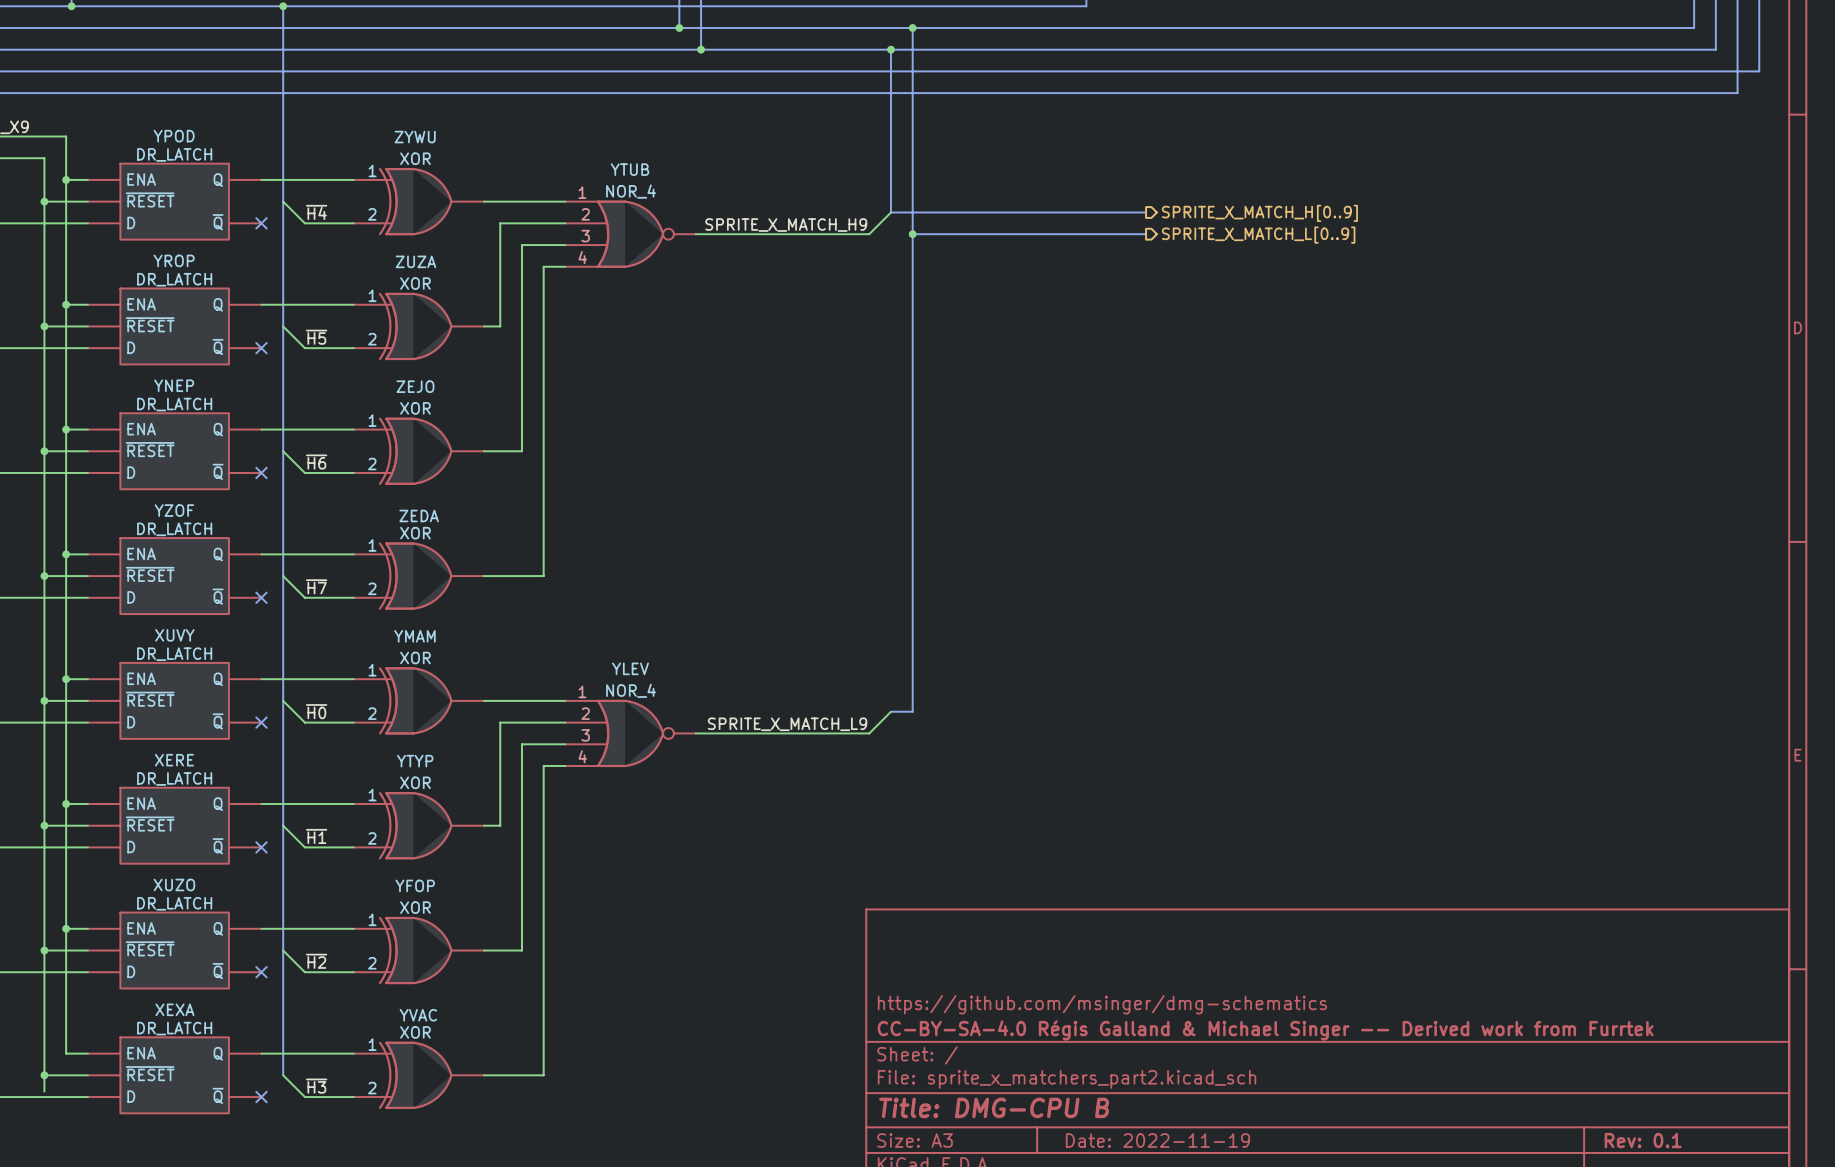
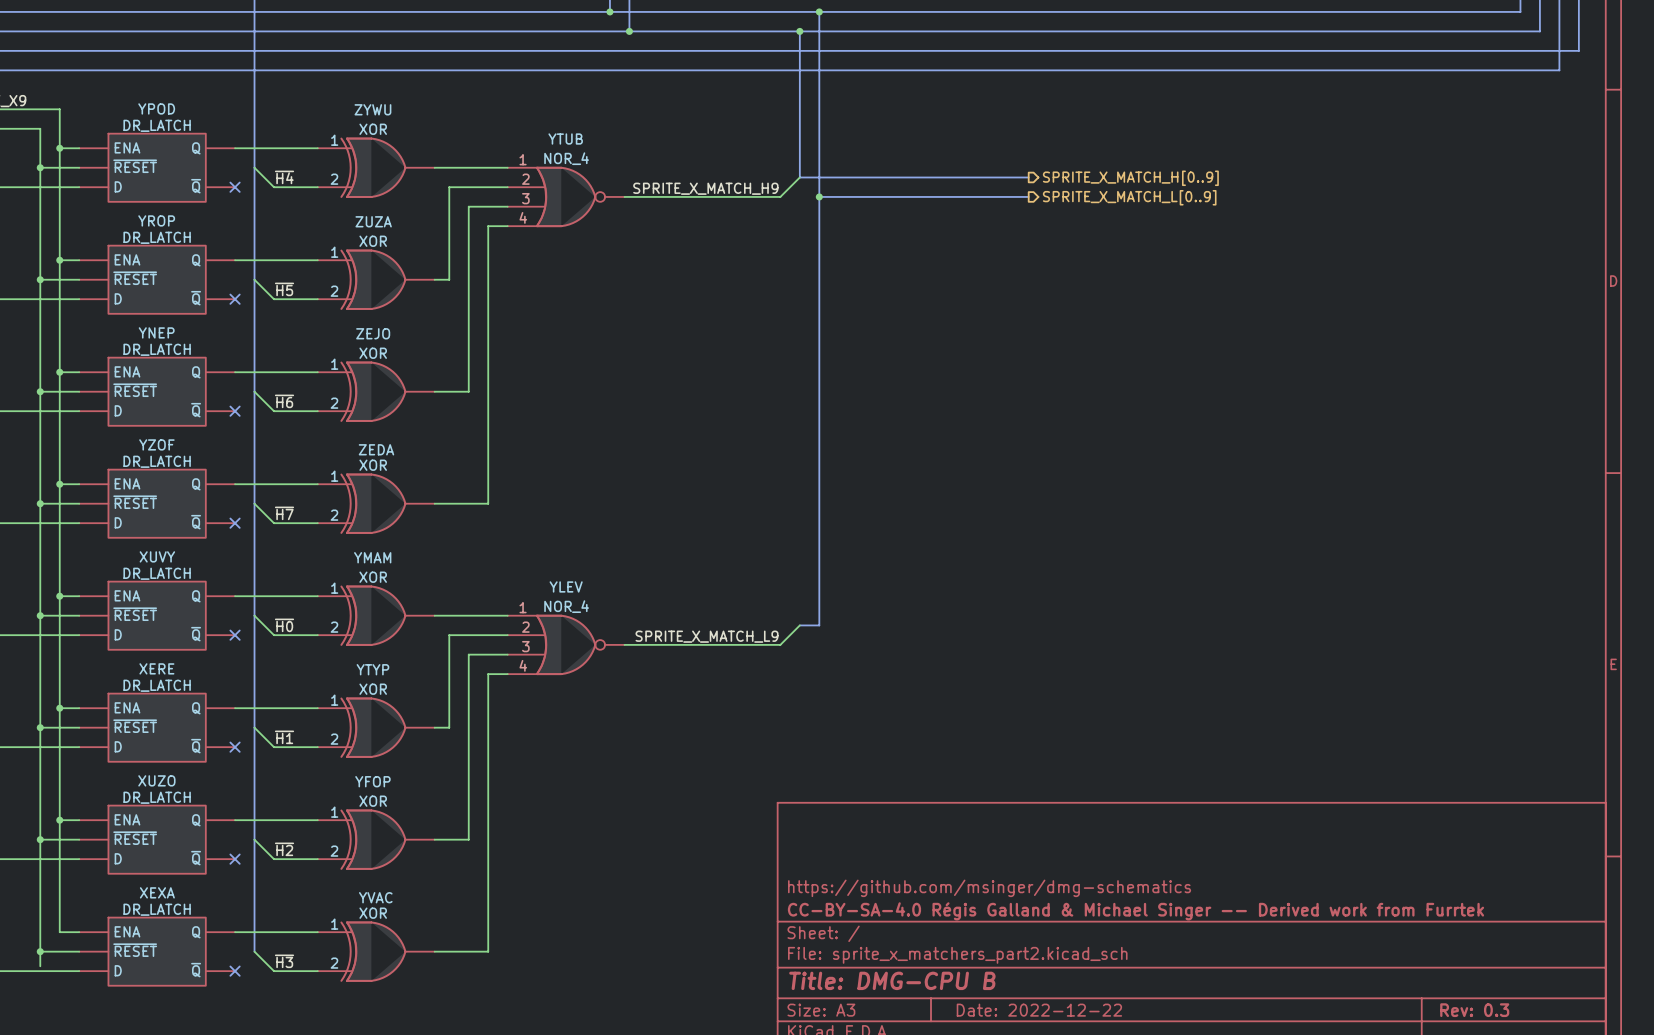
title block: Date: 2022-11-19 (1157, 1140) -> Date: 2022-12-22 (1039, 1010)
title block: Rev: 0.1 (1643, 1140) -> Rev: 0.3 (1474, 1010)

